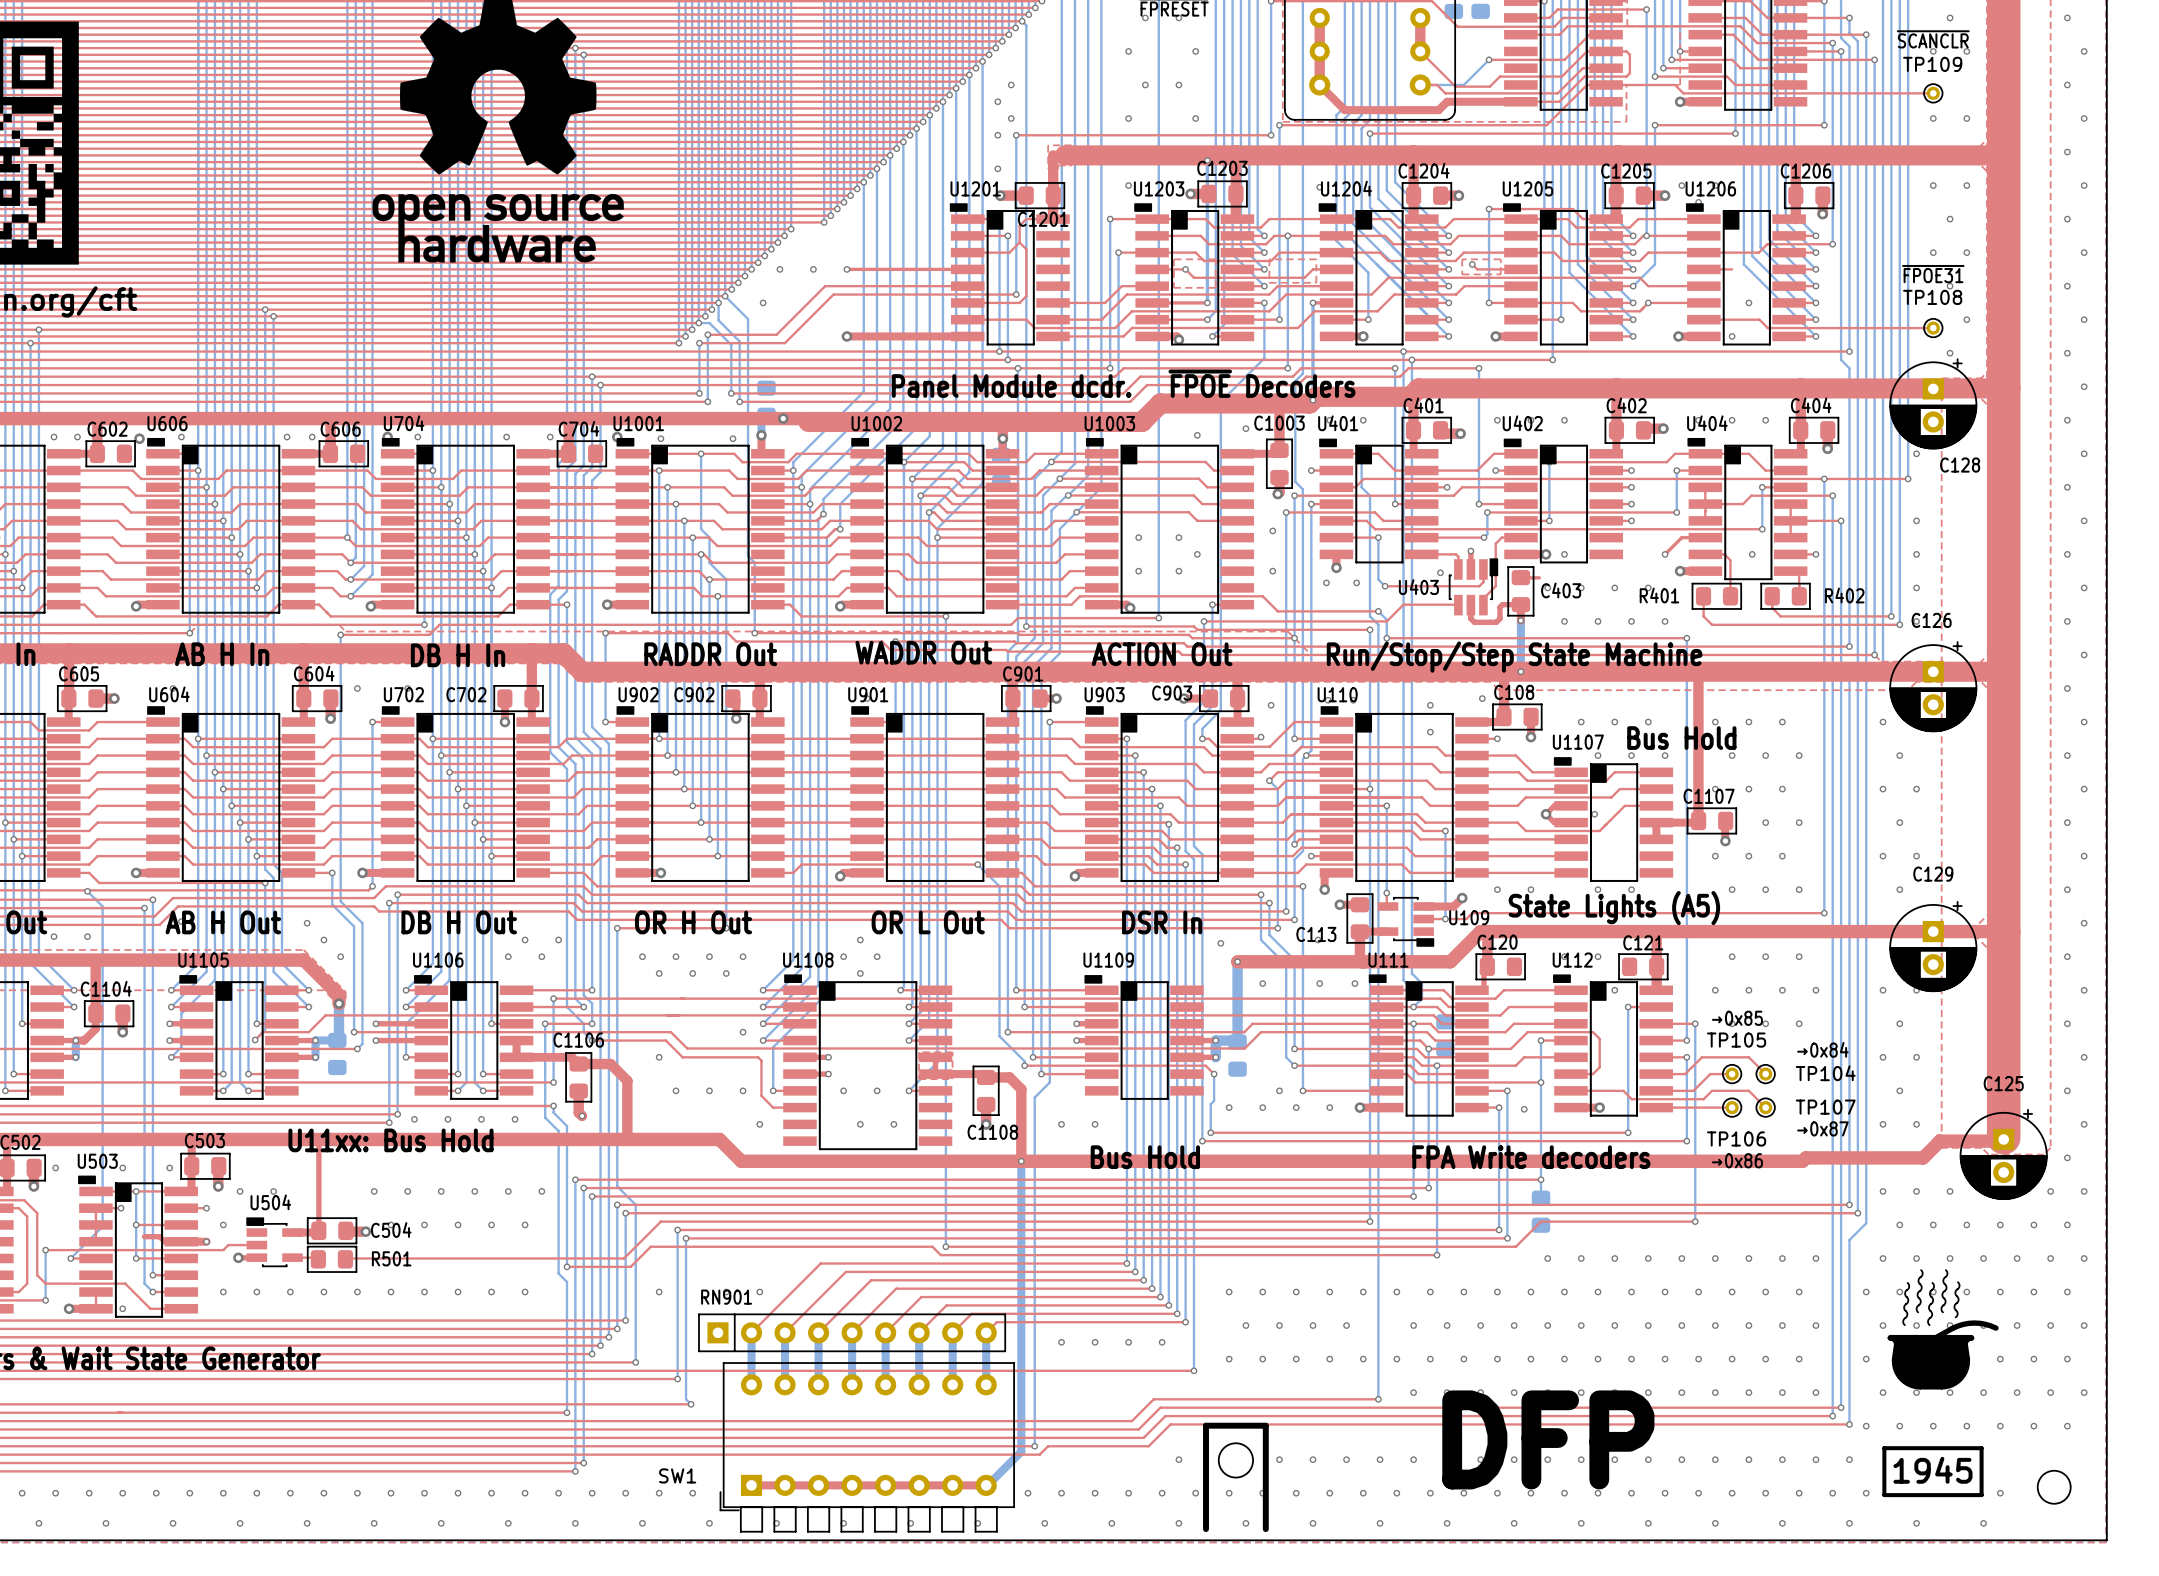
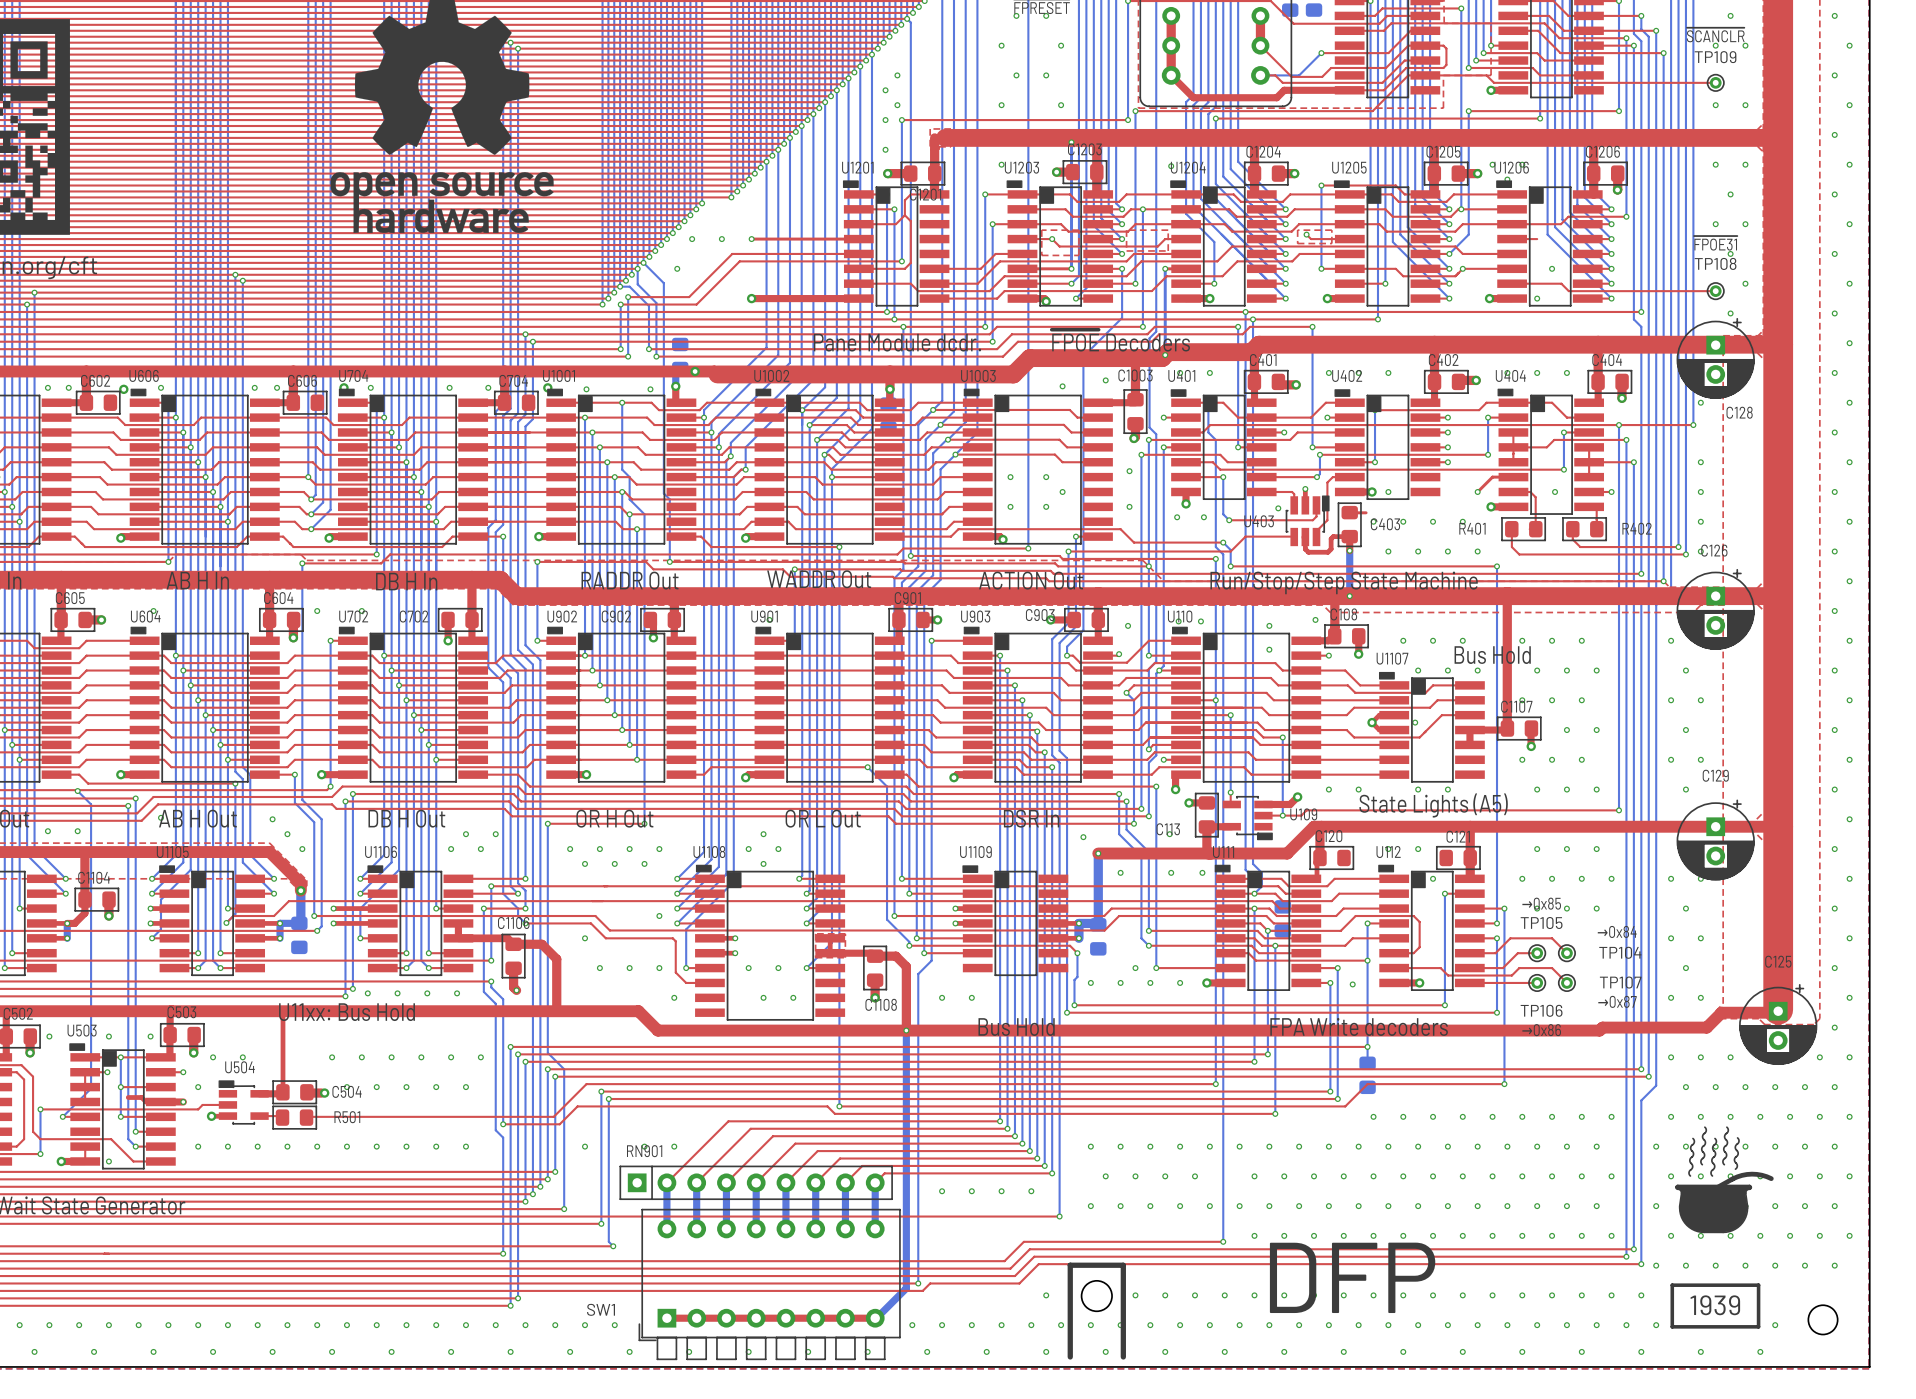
text: 1945 (1932, 1470) -> 1939 (1715, 1305)

